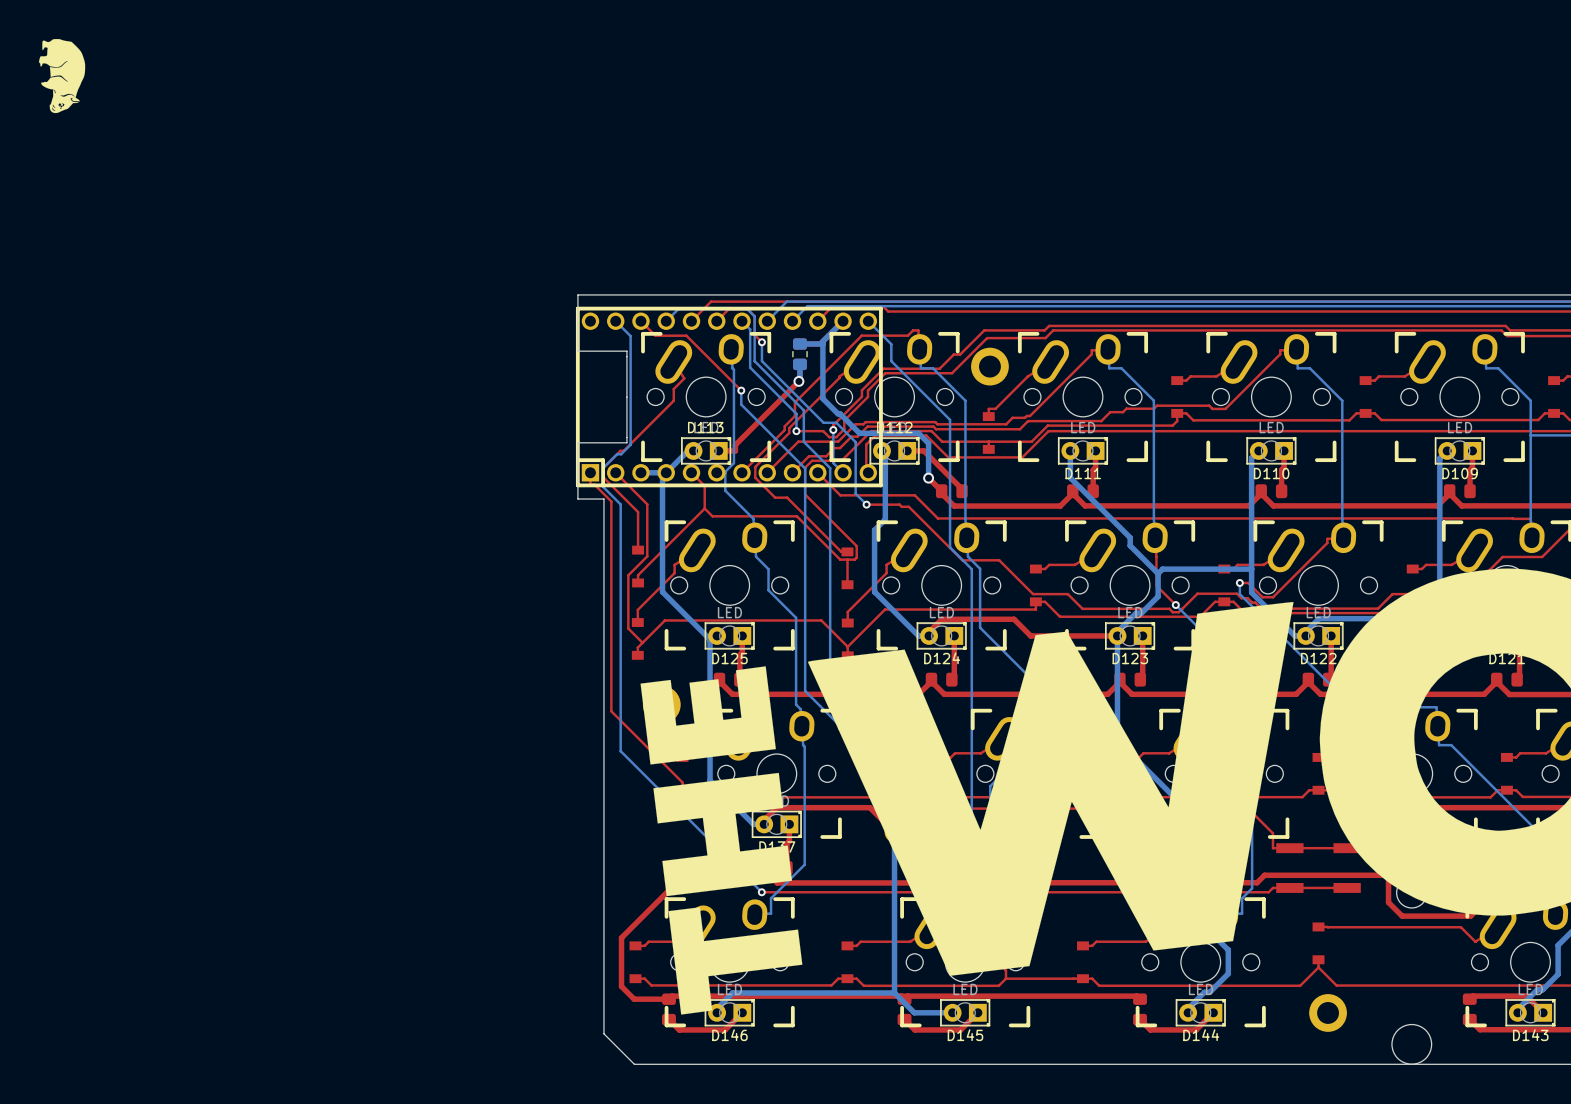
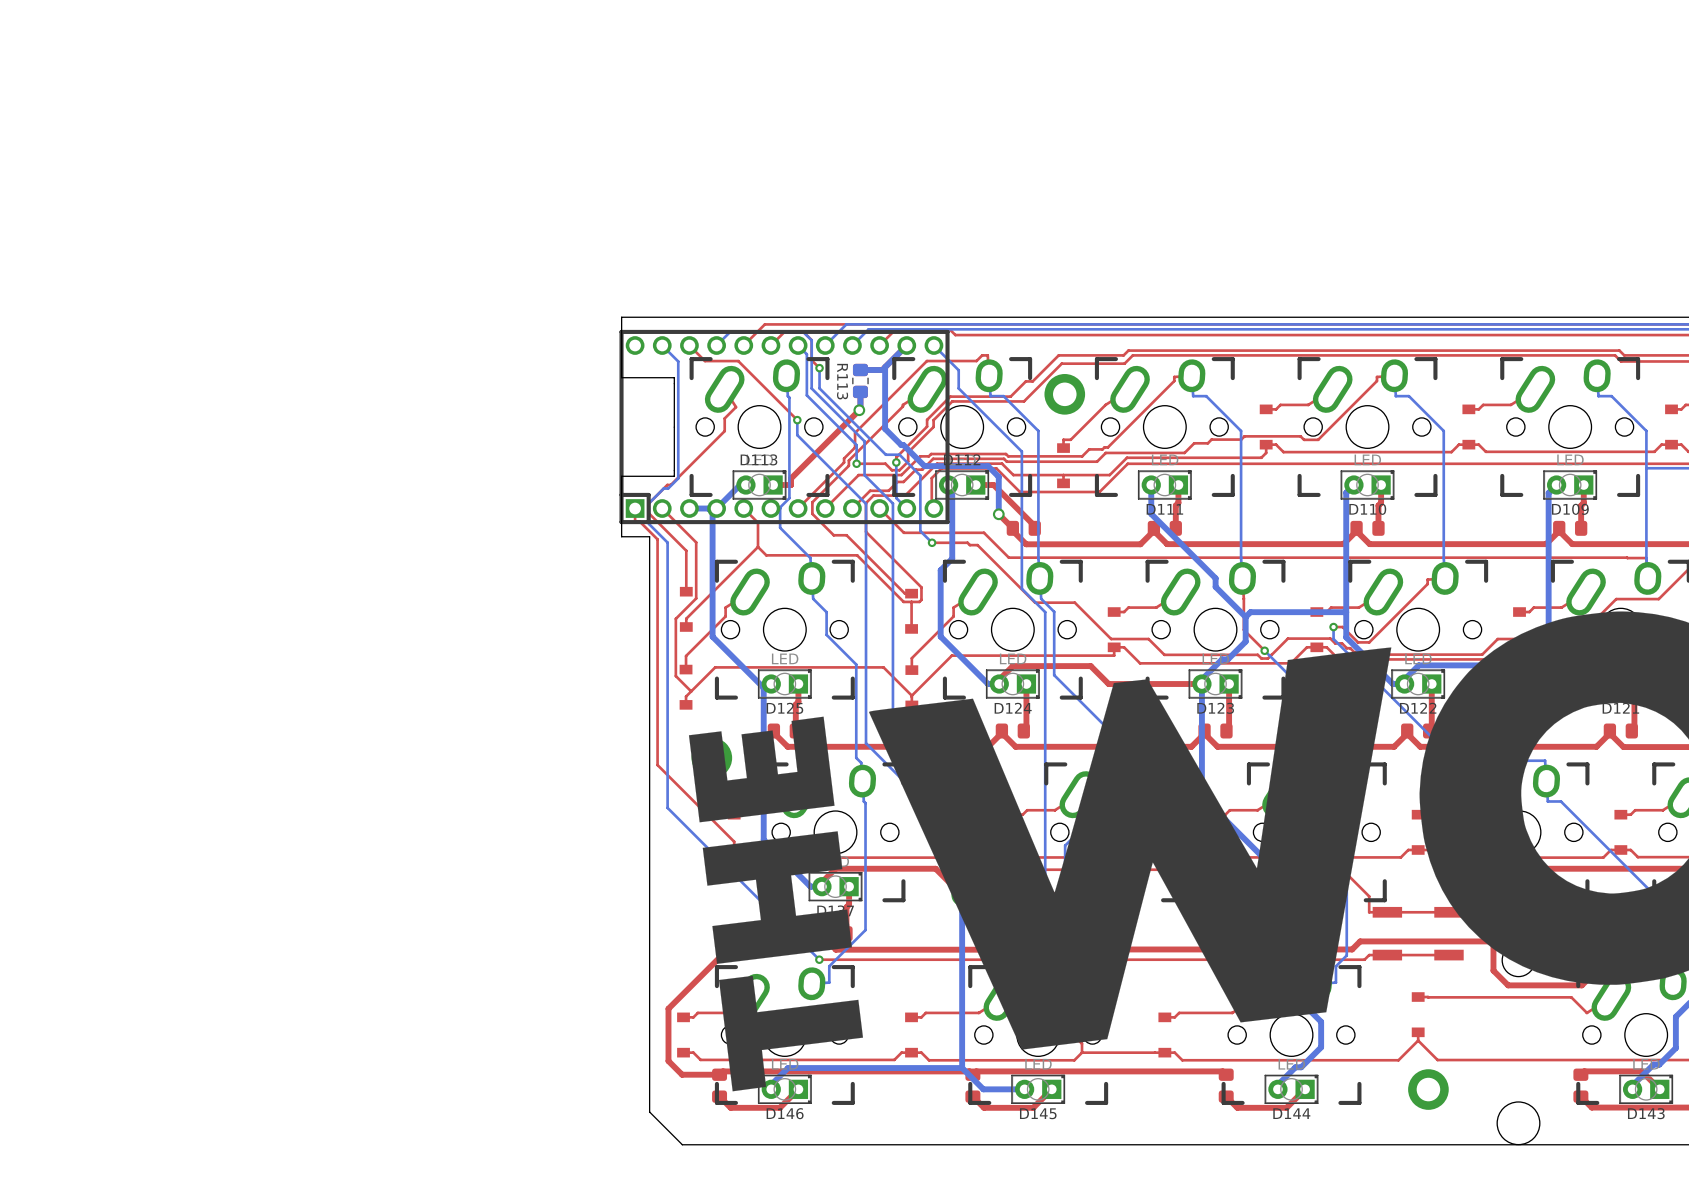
drawing: [39, 39, 86, 114] -> none
drawing: none -> [837, 363, 849, 400]

